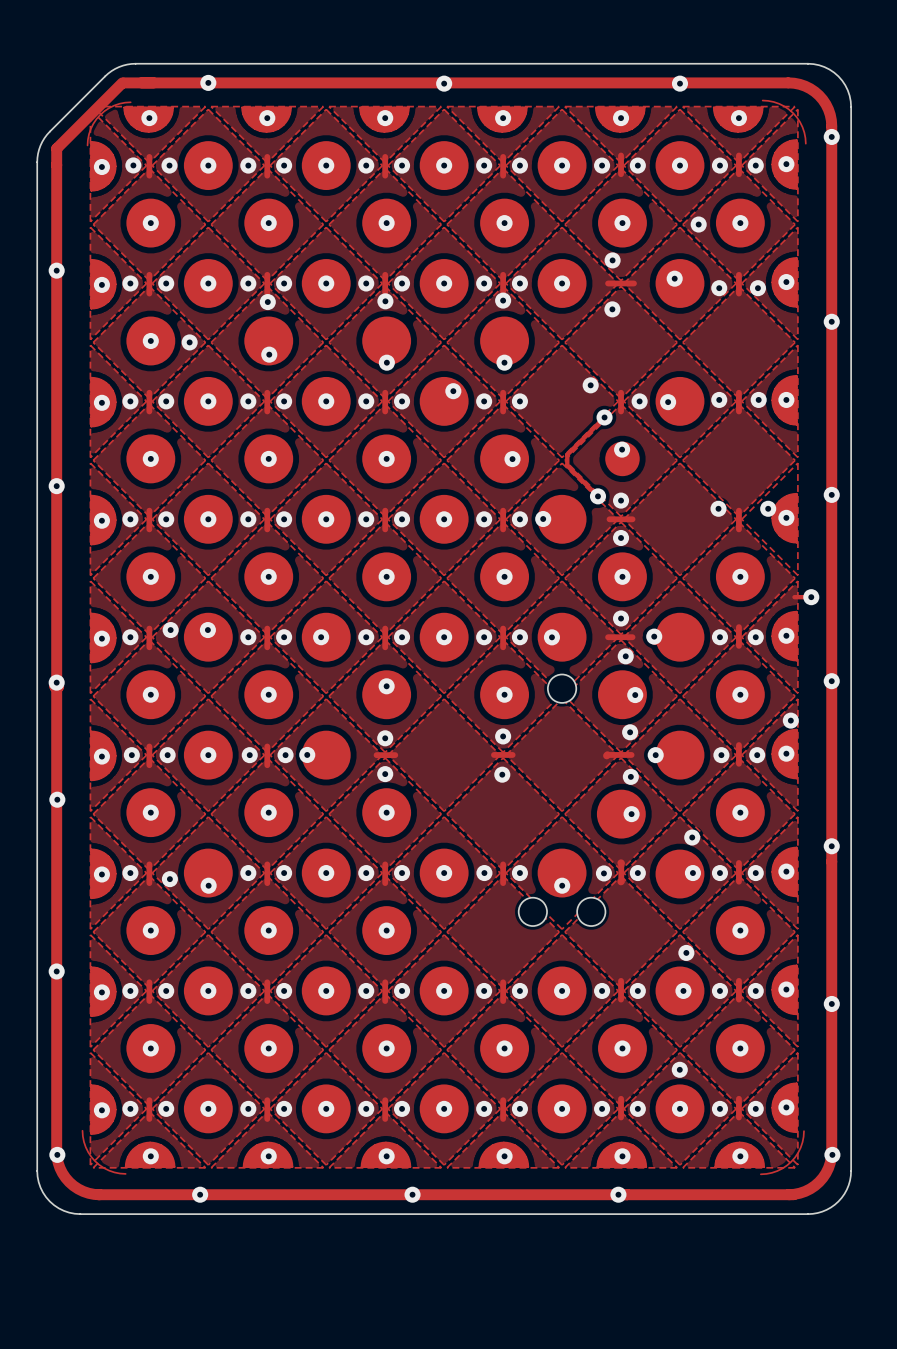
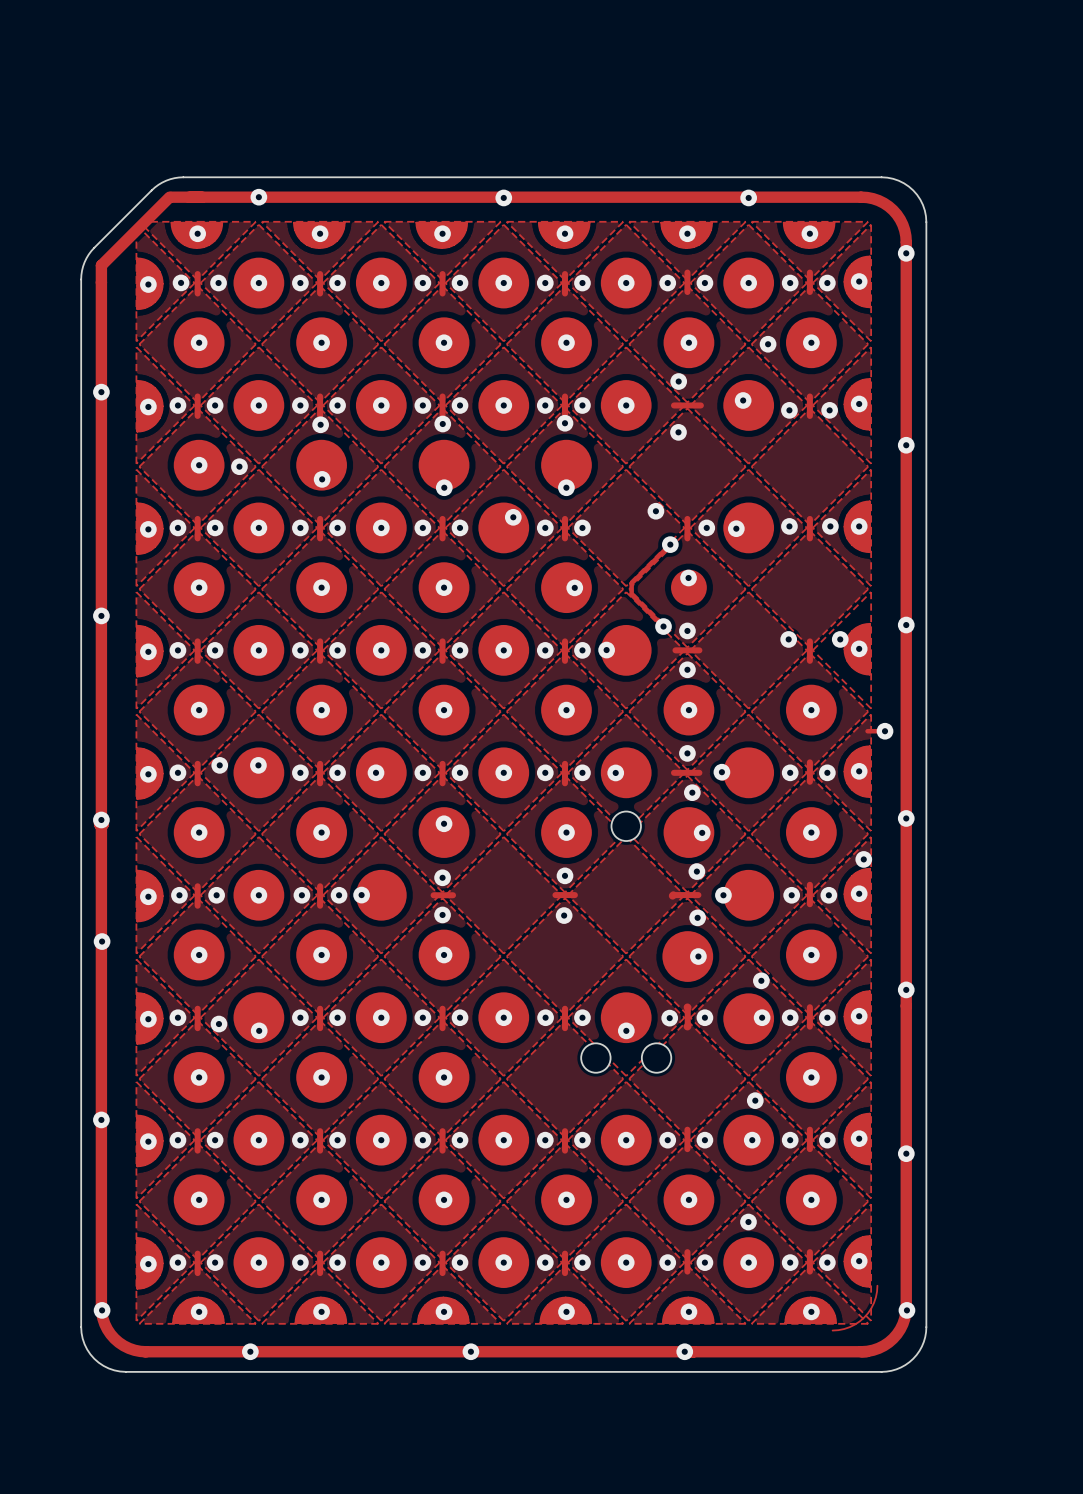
track: (762, 100) (779, 103) (793, 113) (802, 127) (805, 143) -> none
track: (130, 102) (114, 105) (100, 114) (90, 128) (87, 145) -> none
track: (82, 1130) (85, 1147) (95, 1161) (109, 1170) (125, 1173) -> none

